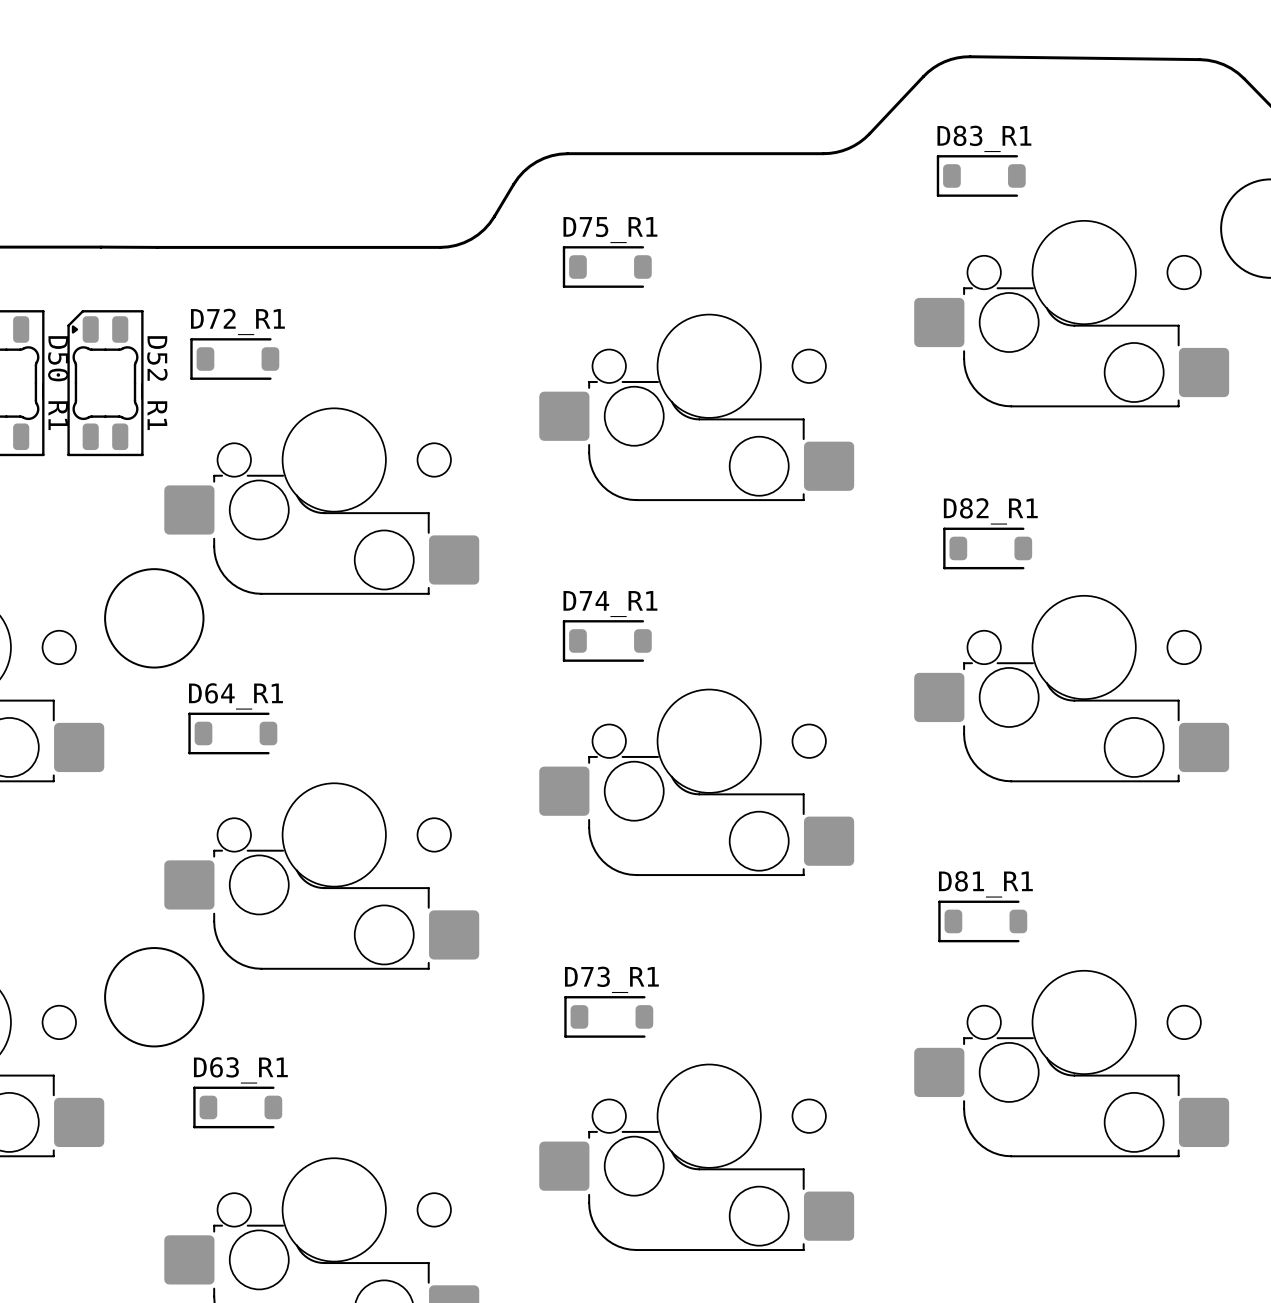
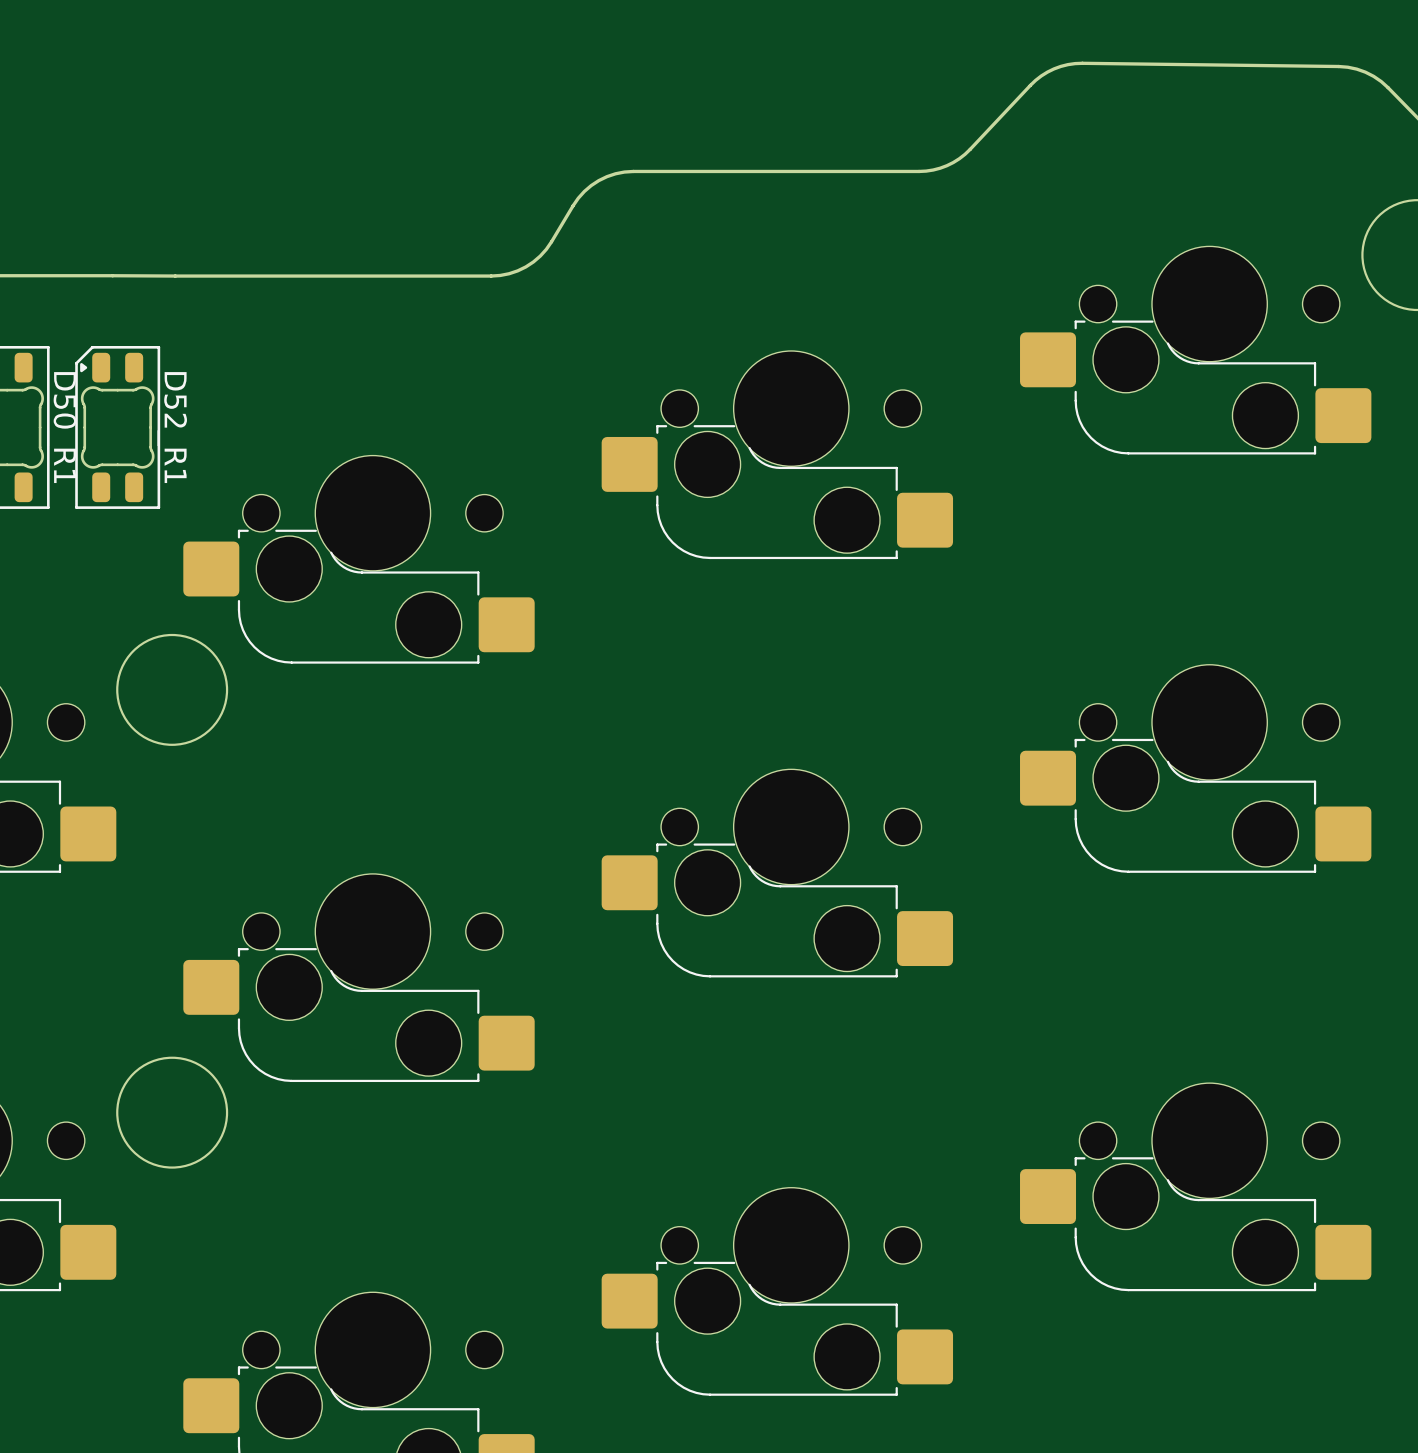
D83_R1: (981, 175) -> none
D75_R1: (607, 267) -> none
D72_R1: (234, 359) -> none
D82_R1: (987, 548) -> none
D74_R1: (607, 640) -> none
D64_R1: (232, 733) -> none
D81_R1: (982, 921) -> none
D73_R1: (608, 1016) -> none
D63_R1: (237, 1107) -> none

